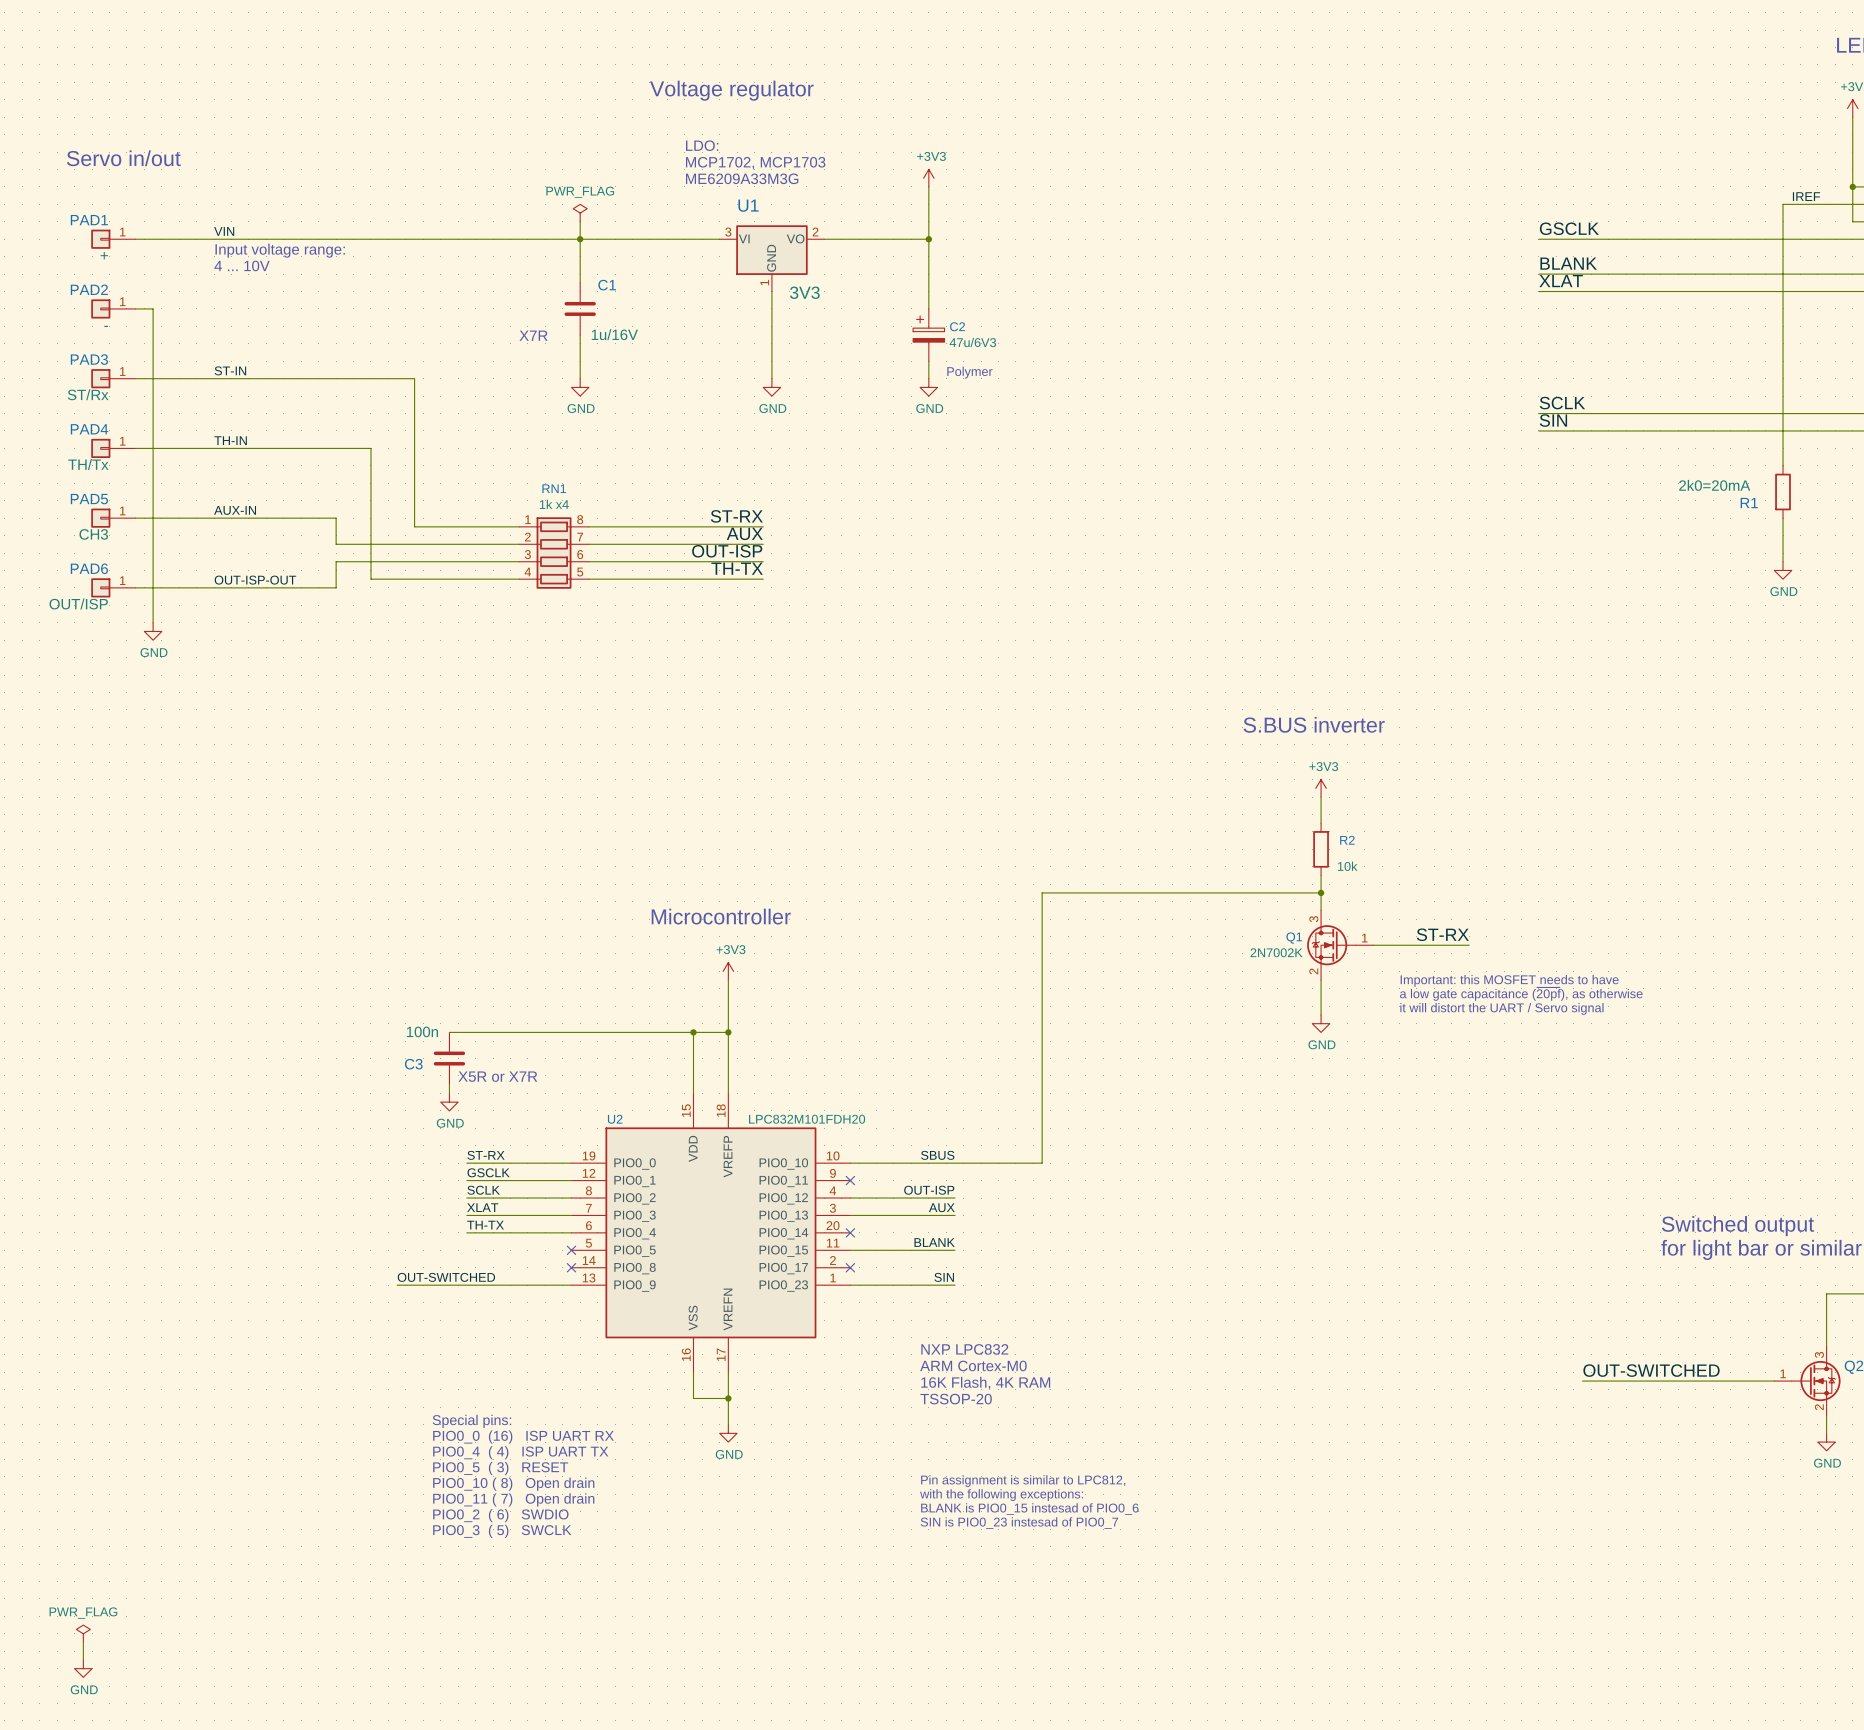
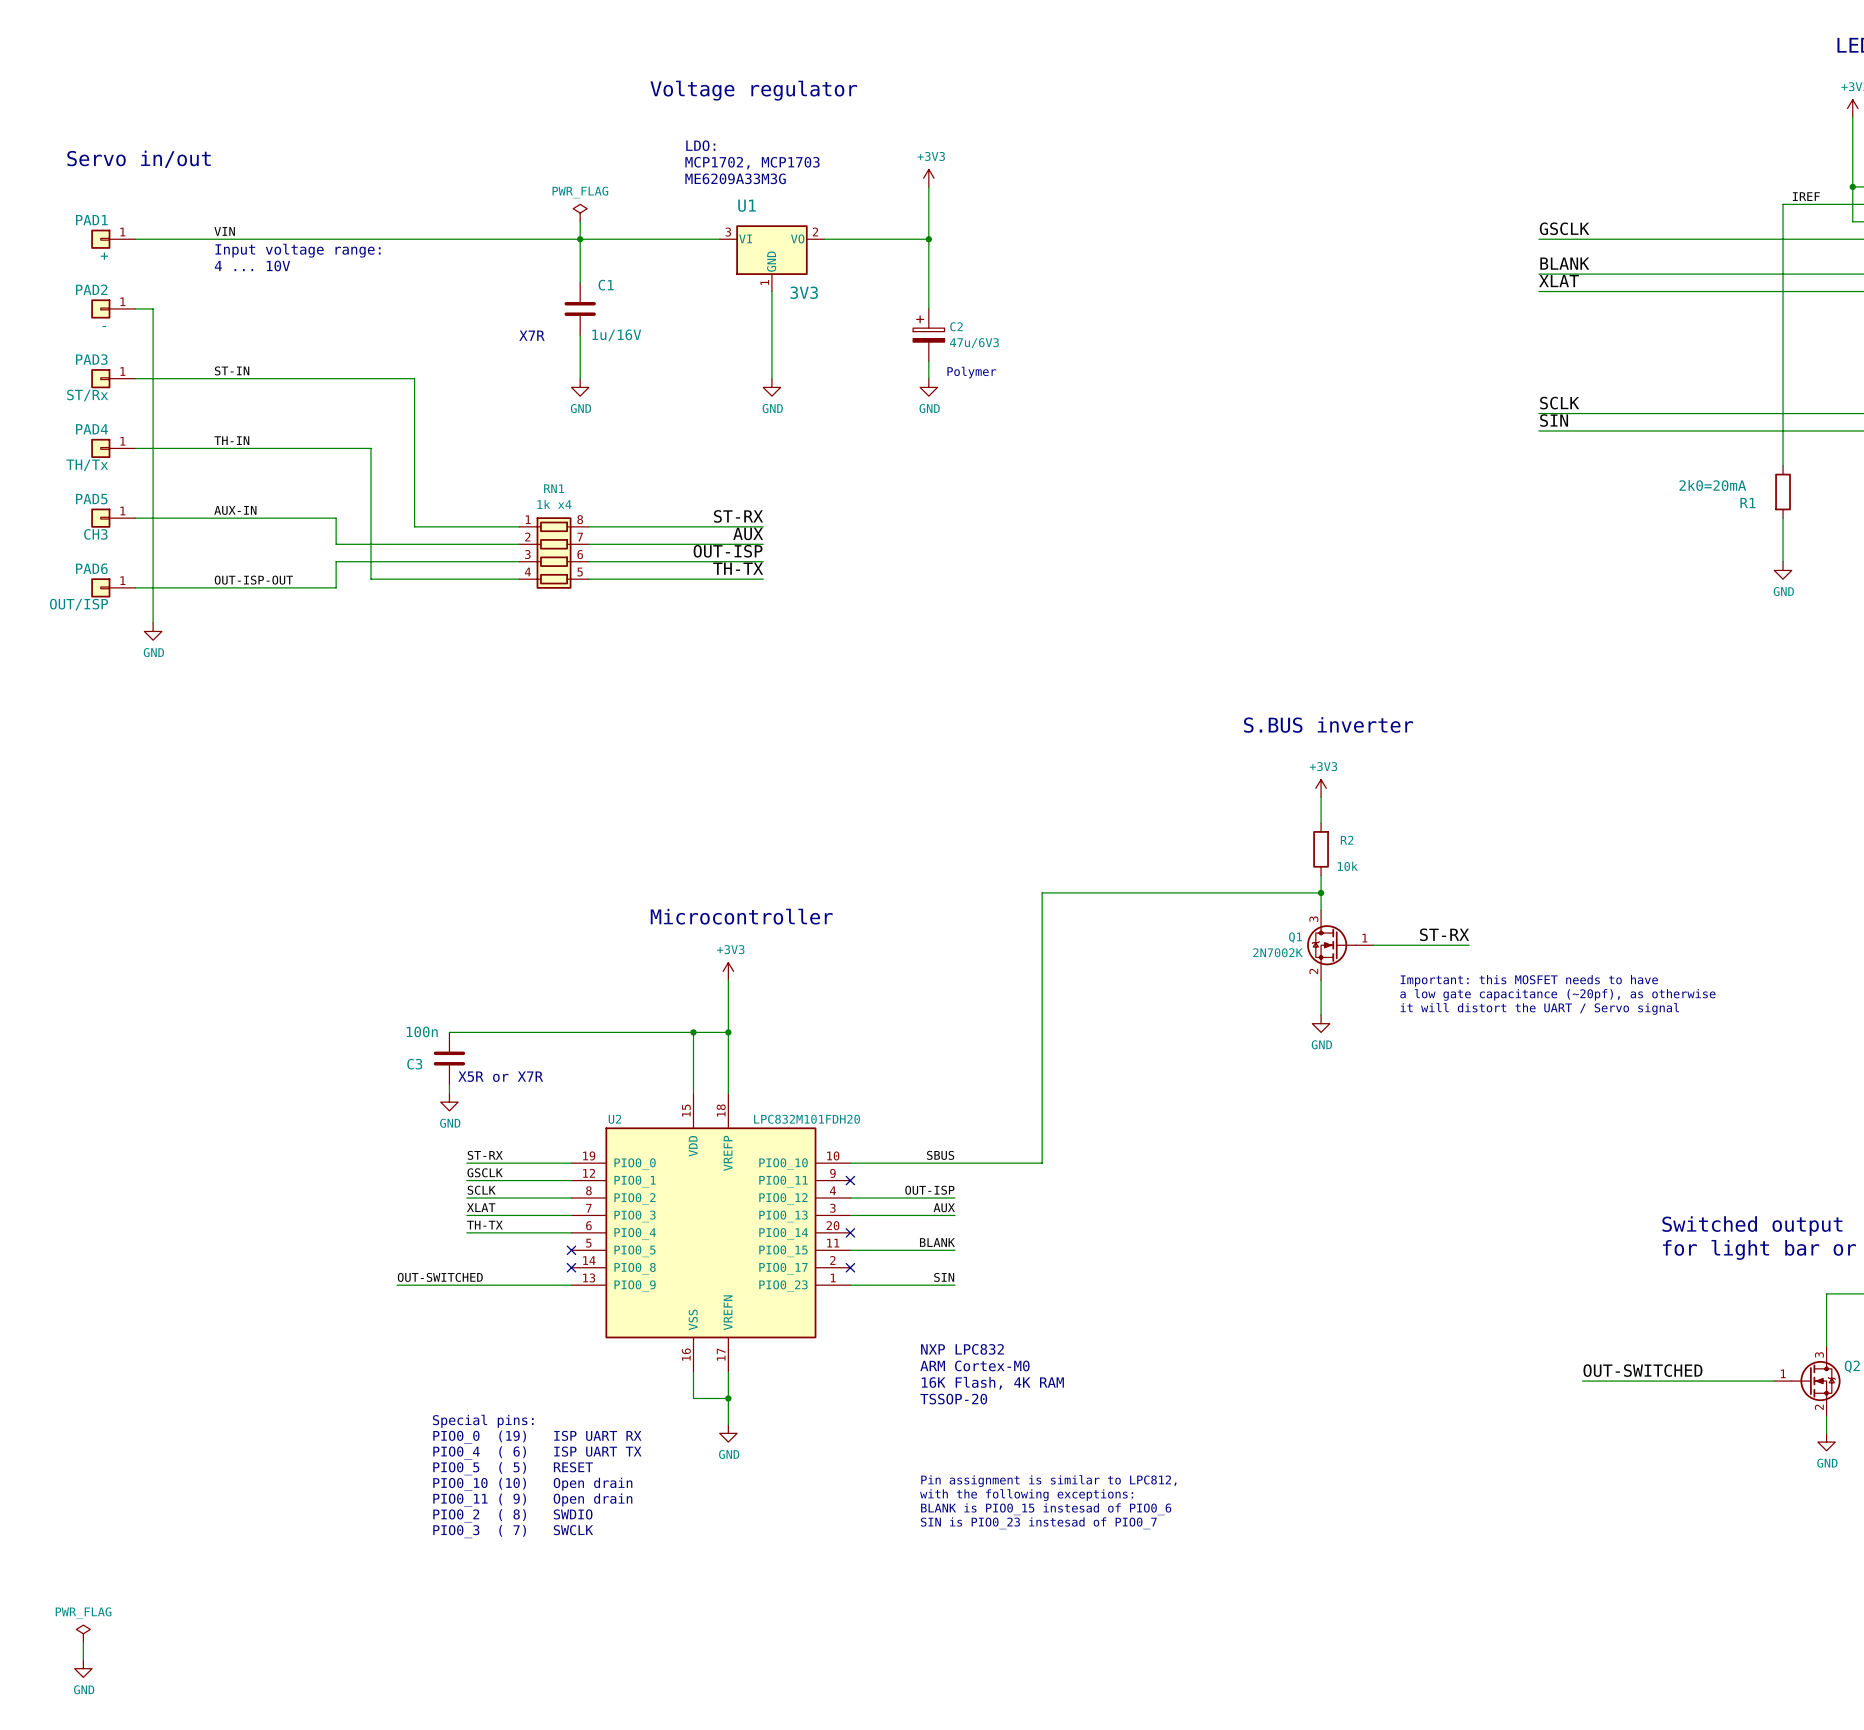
text: a low gate capacitance (~{20pf}), as otherwise (1521, 994) -> a low gate capacitance (~20pf), as otherwise (1557, 994)
text: PIO0_0 (16) ISP UART RX (523, 1437) -> PIO0_0 (19) ISP UART RX (537, 1437)
text: PIO0_4 ( 4) ISP UART TX (520, 1452) -> PIO0_4 ( 6) ISP UART TX (537, 1452)
text: PIO0_5 ( 3) RESET (500, 1468) -> PIO0_5 ( 5) RESET (513, 1468)
text: PIO0_10 ( 8) Open drain (513, 1484) -> PIO0_10 (10) Open drain (532, 1484)
text: PIO0_11 ( 7) Open drain (513, 1499) -> PIO0_11 ( 9) Open drain (532, 1500)
text: PIO0_2 ( 6) SWDIO (500, 1515) -> PIO0_2 ( 8) SWDIO (512, 1515)
text: PIO0_3 ( 5) SWCLK (502, 1531) -> PIO0_3 ( 7) SWCLK (513, 1531)

